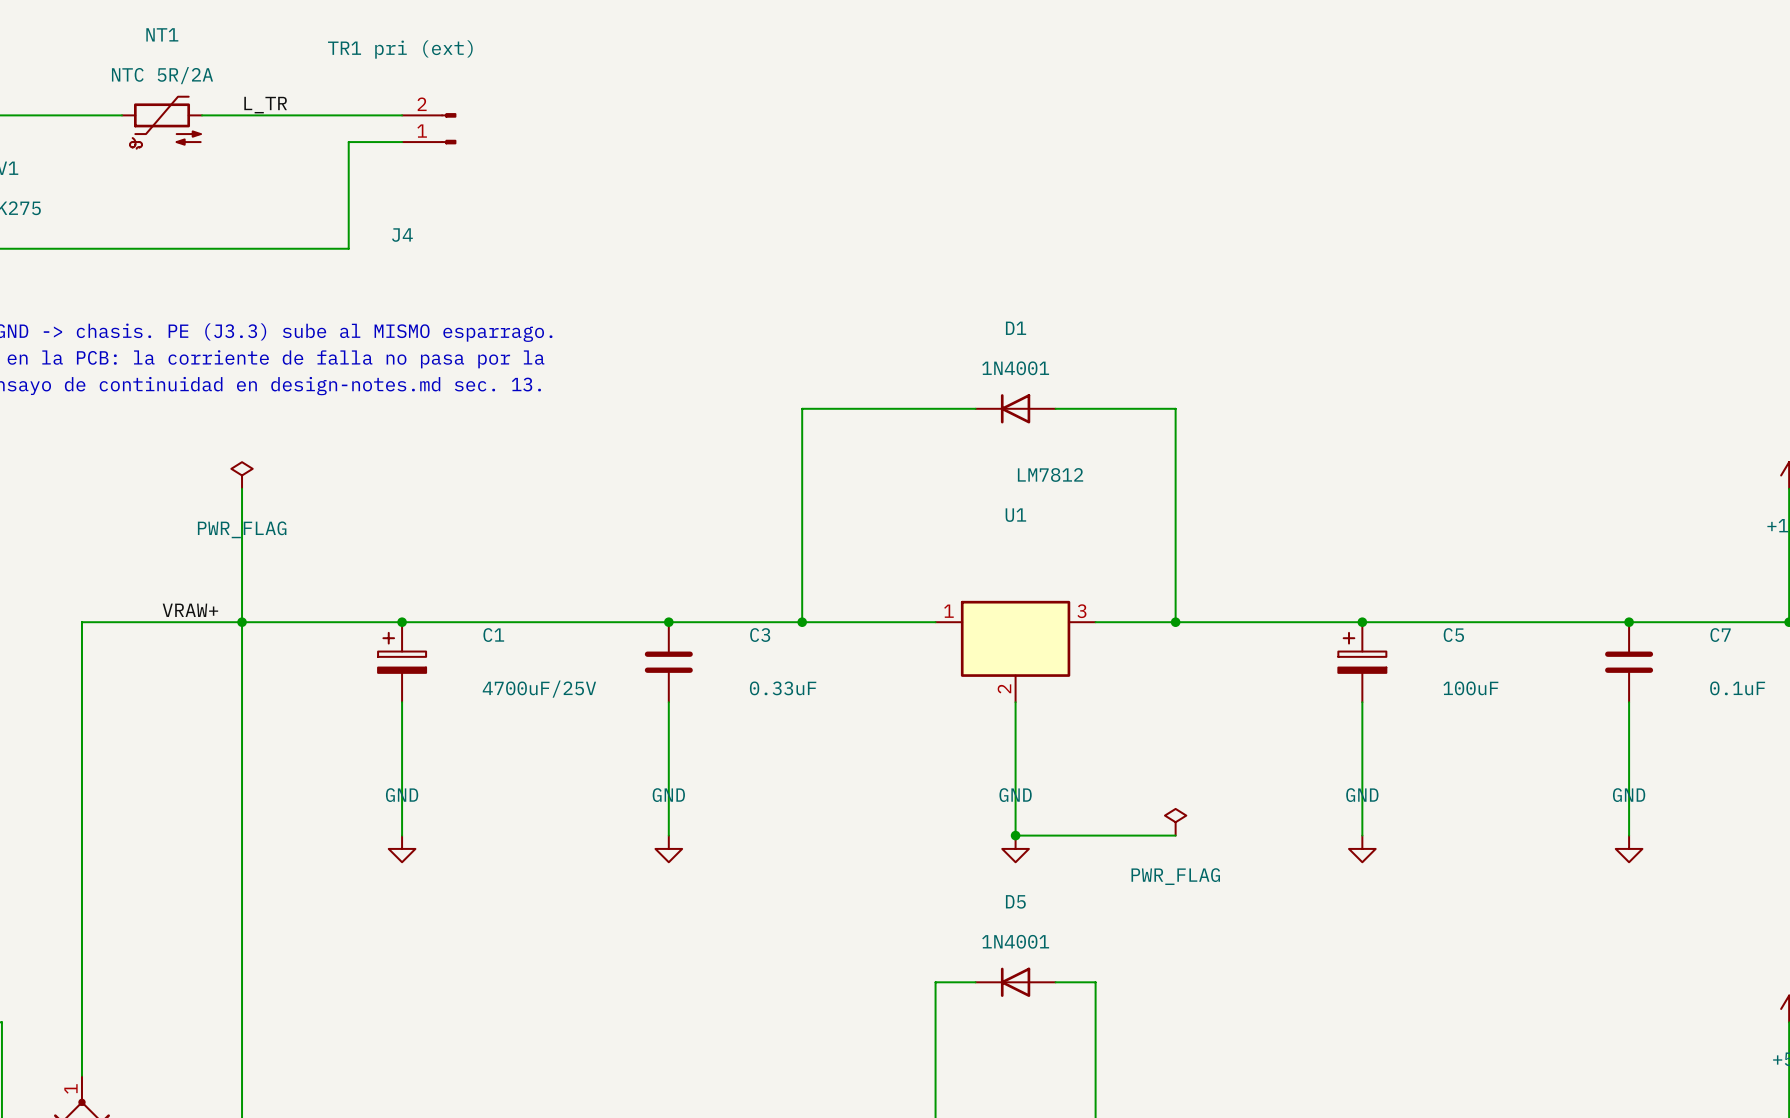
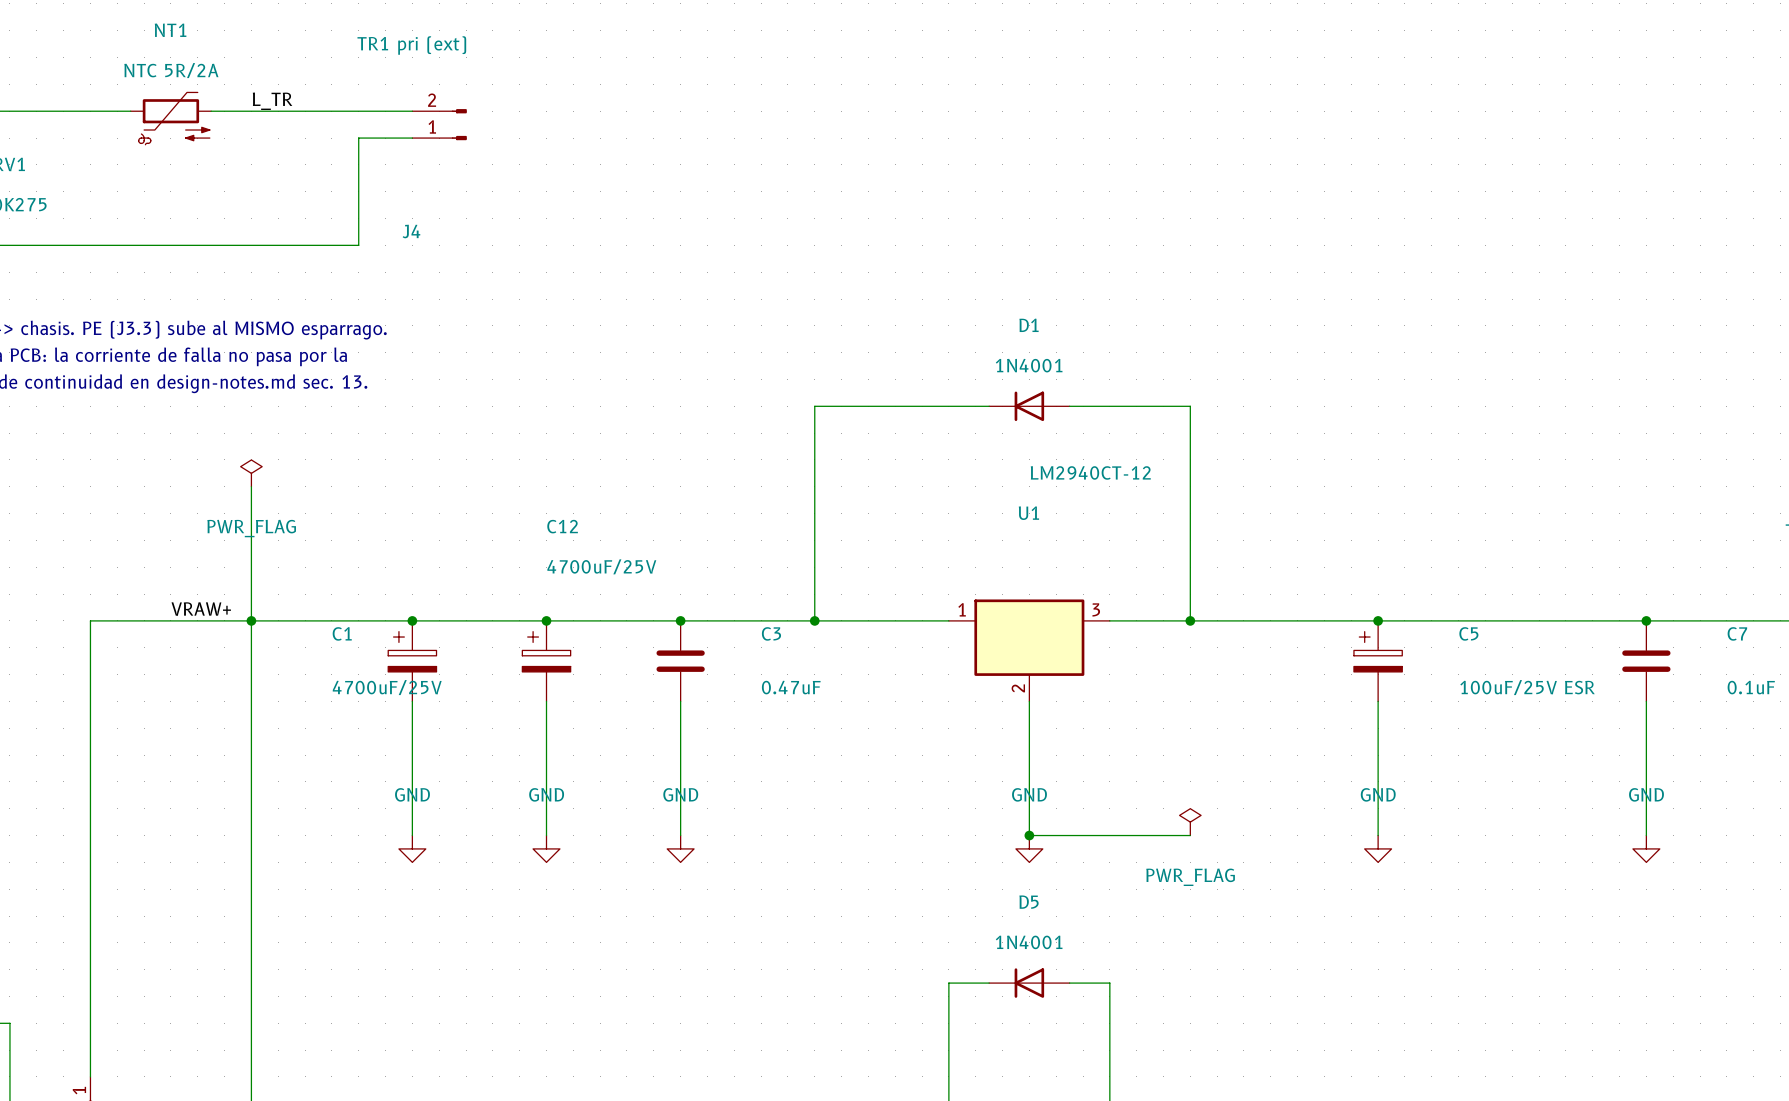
U1 value: LM7812 (1050, 474) -> LM2940CT-12 (1090, 472)
junction: none -> (546, 620)
C1 name position: C1 (493, 635) -> C1 (342, 633)
C12: none -> 4700uF/25V (546, 661)
C3 value: 0.33uF (783, 688) -> 0.47uF (791, 687)
C5 value: 100uF (1470, 688) -> 100uF/25V ESR (1527, 687)
C1 value position: 4700uF/25V (539, 689) -> 4700uF/25V (387, 687)
wire: none -> (546, 701) (546, 835)
power symbol: none -> GND (546, 848)

